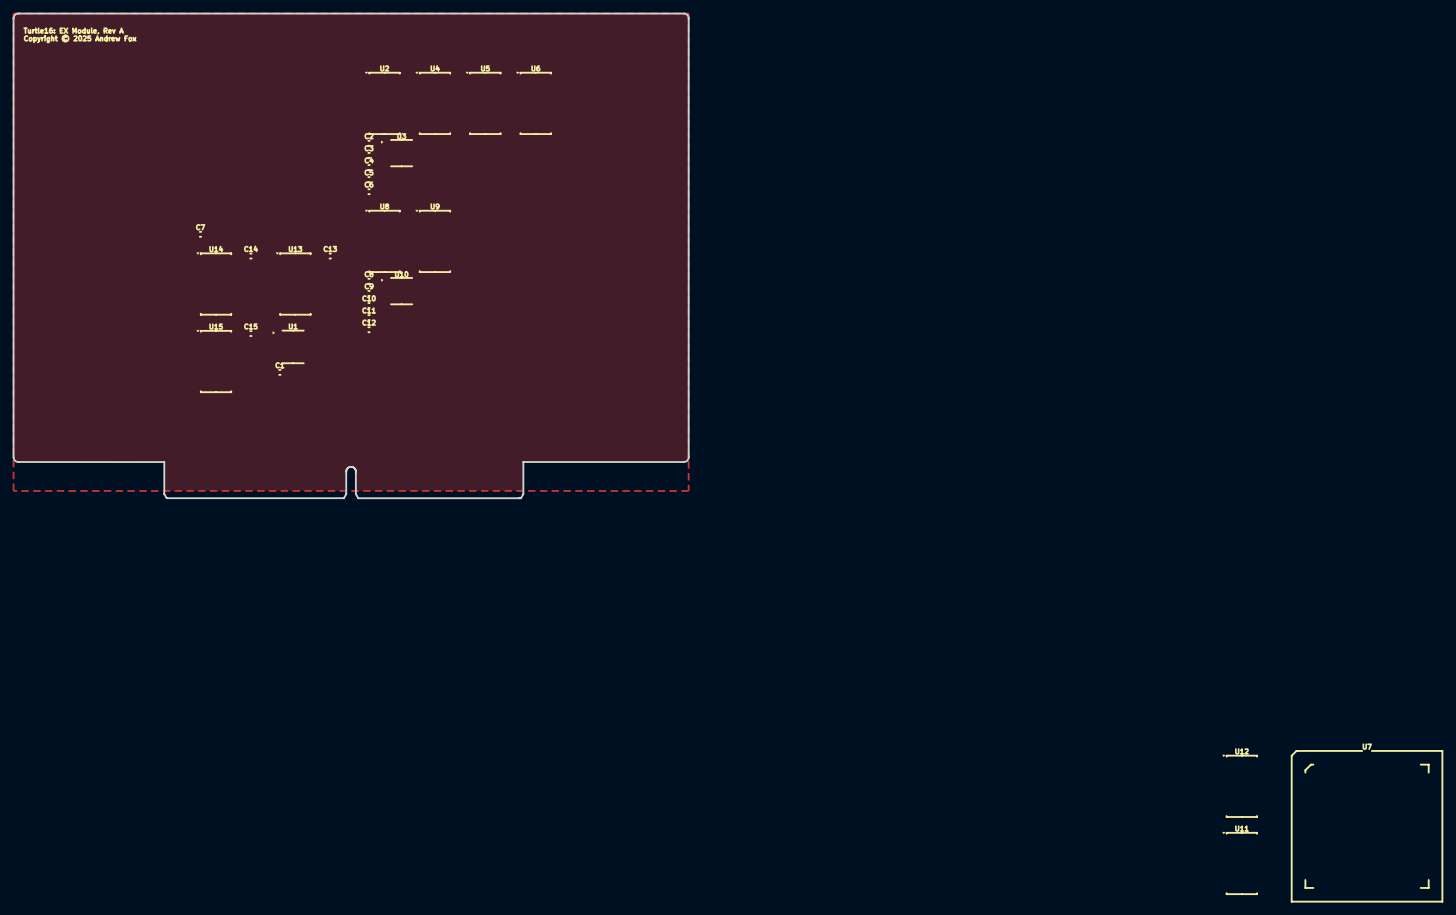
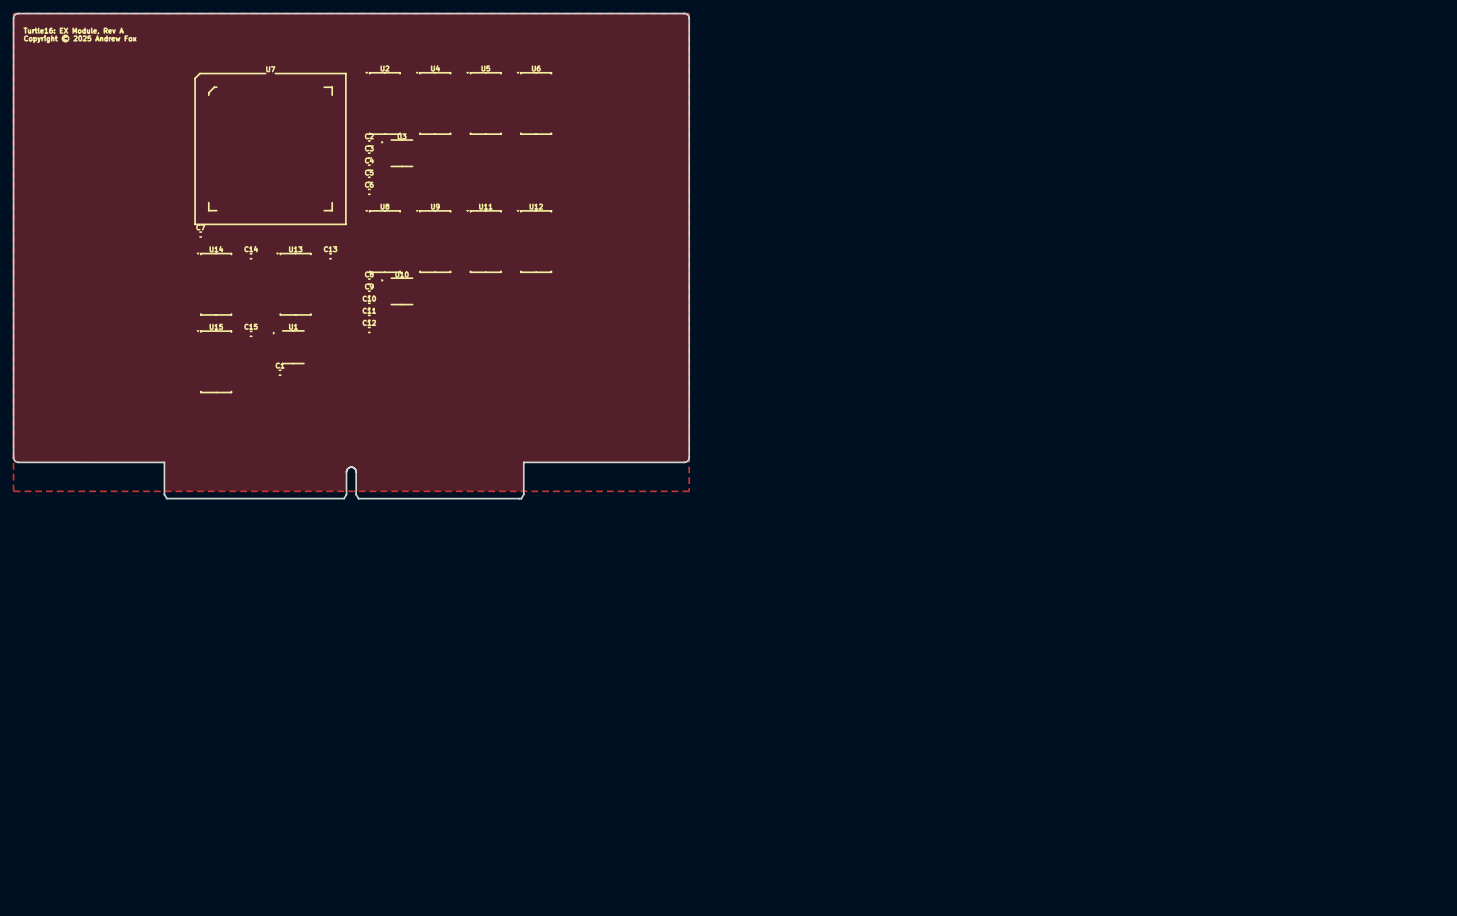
part position: (1239, 786) -> (534, 241)
part position: (1367, 826) -> (270, 148)
part position: (1239, 863) -> (483, 241)

